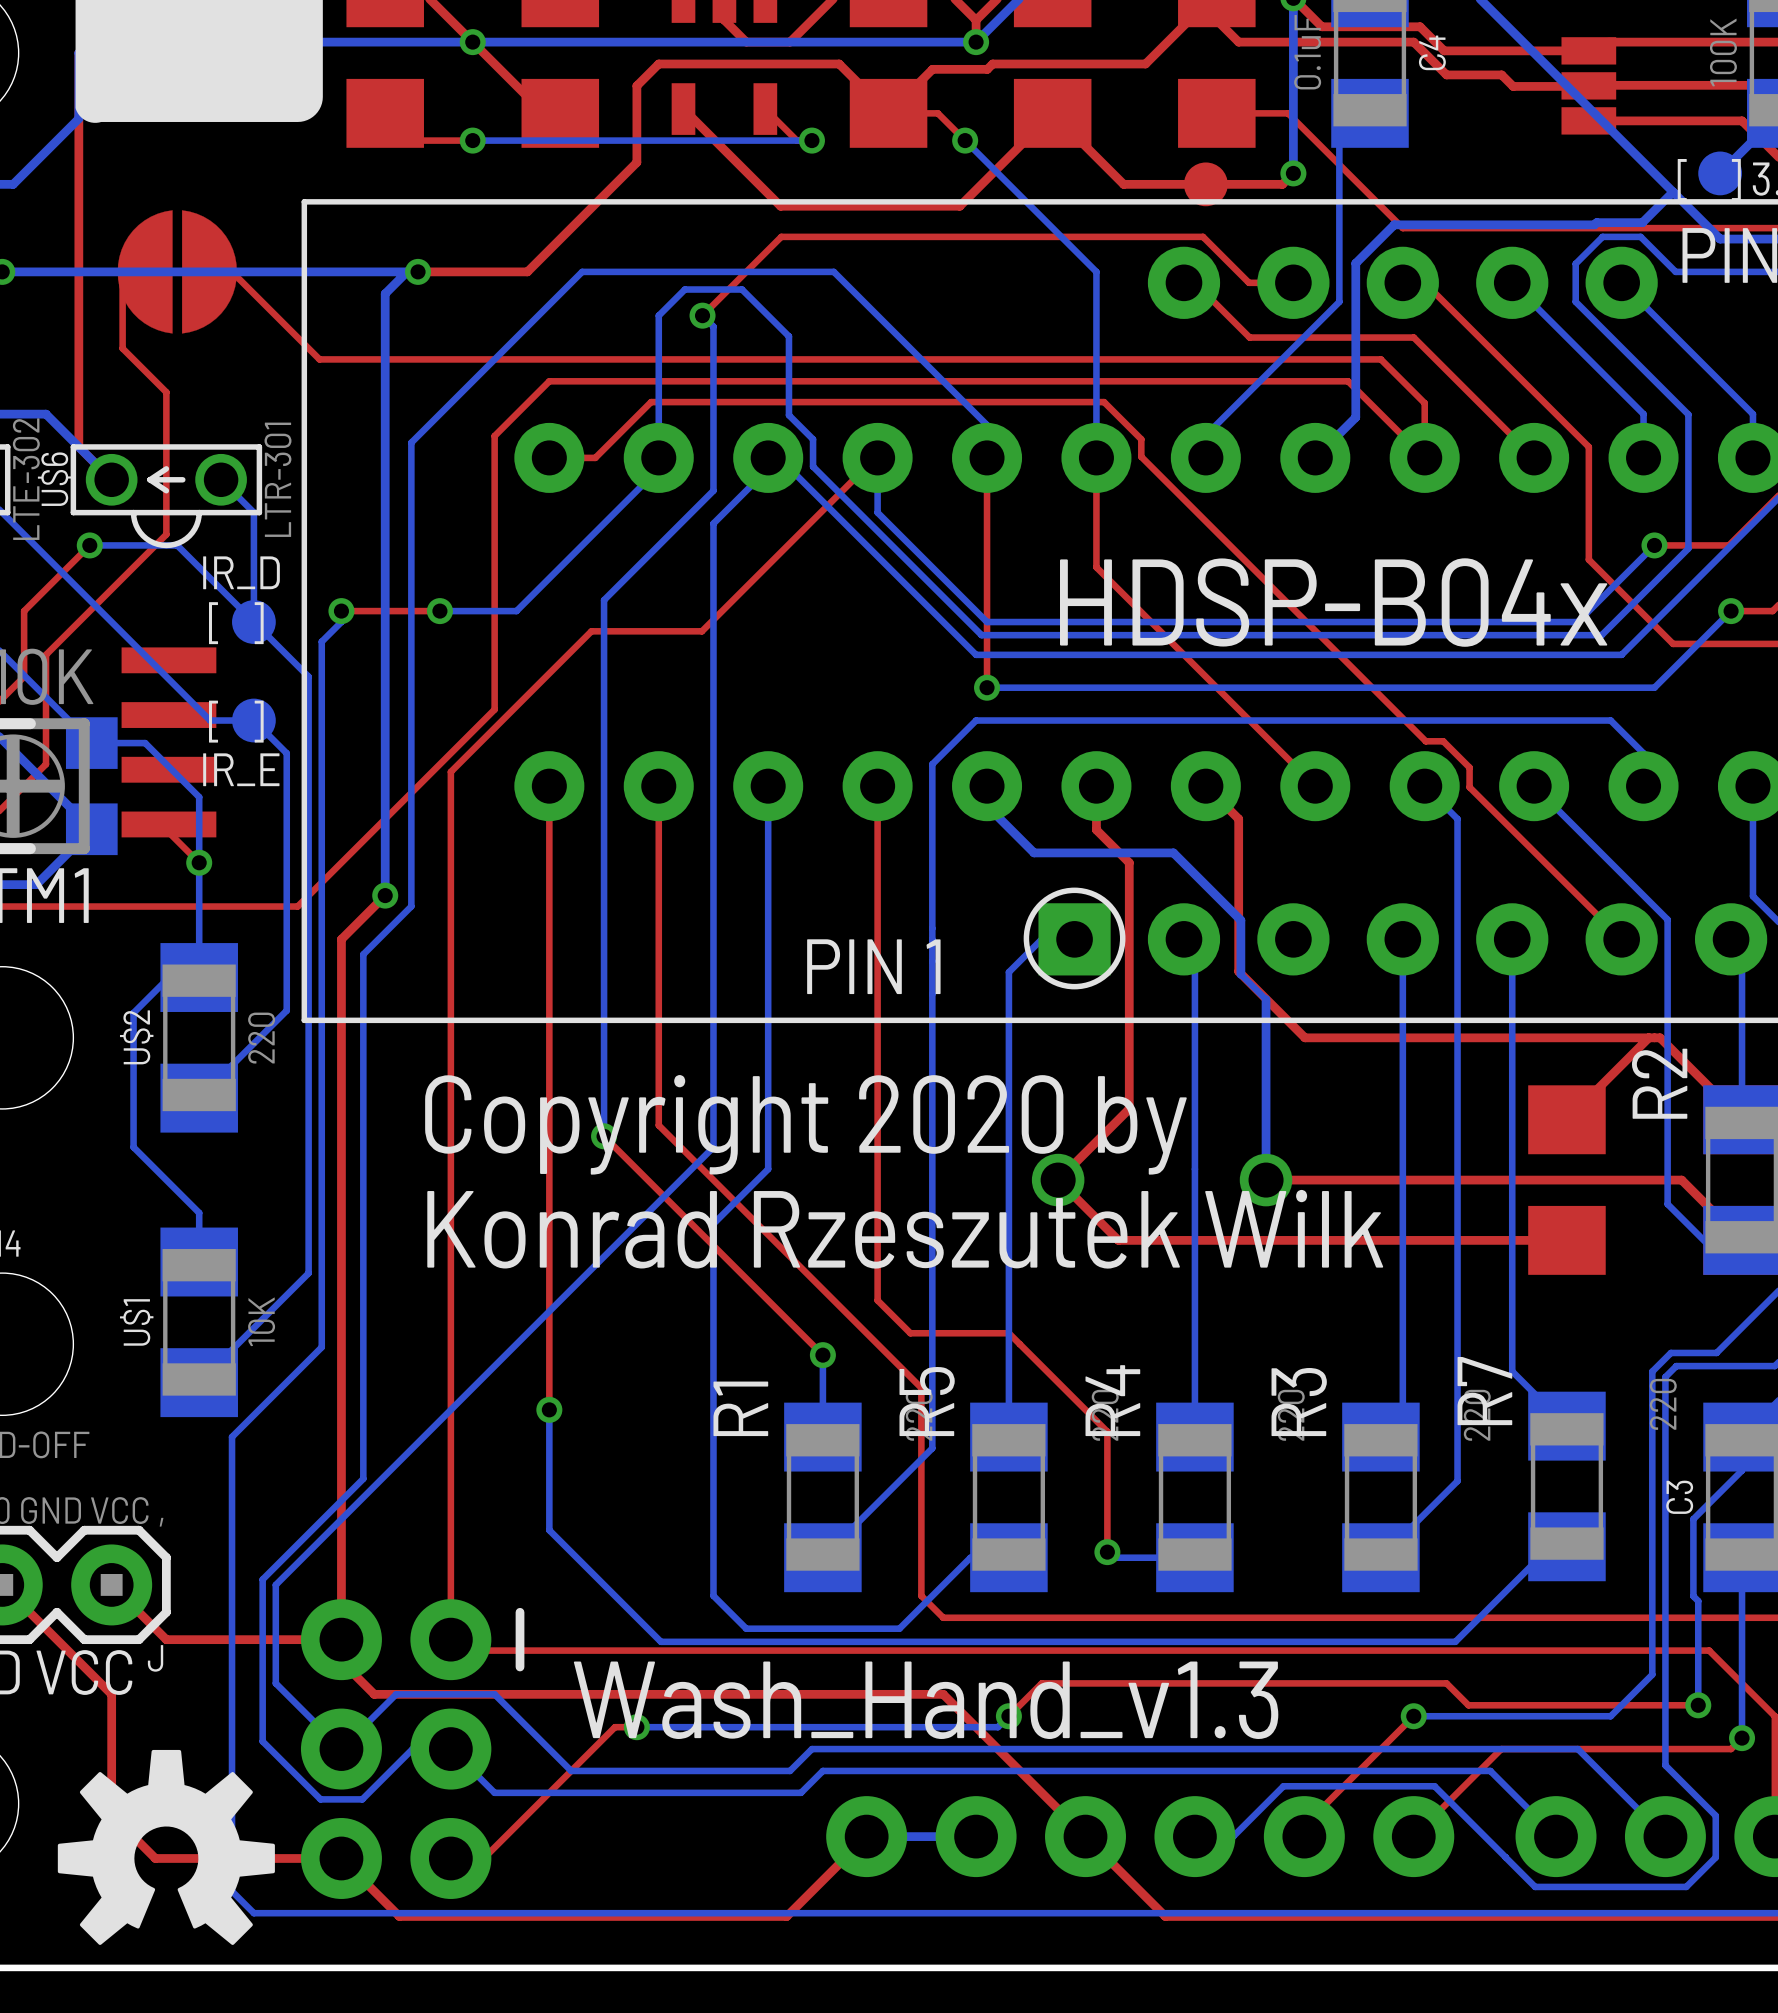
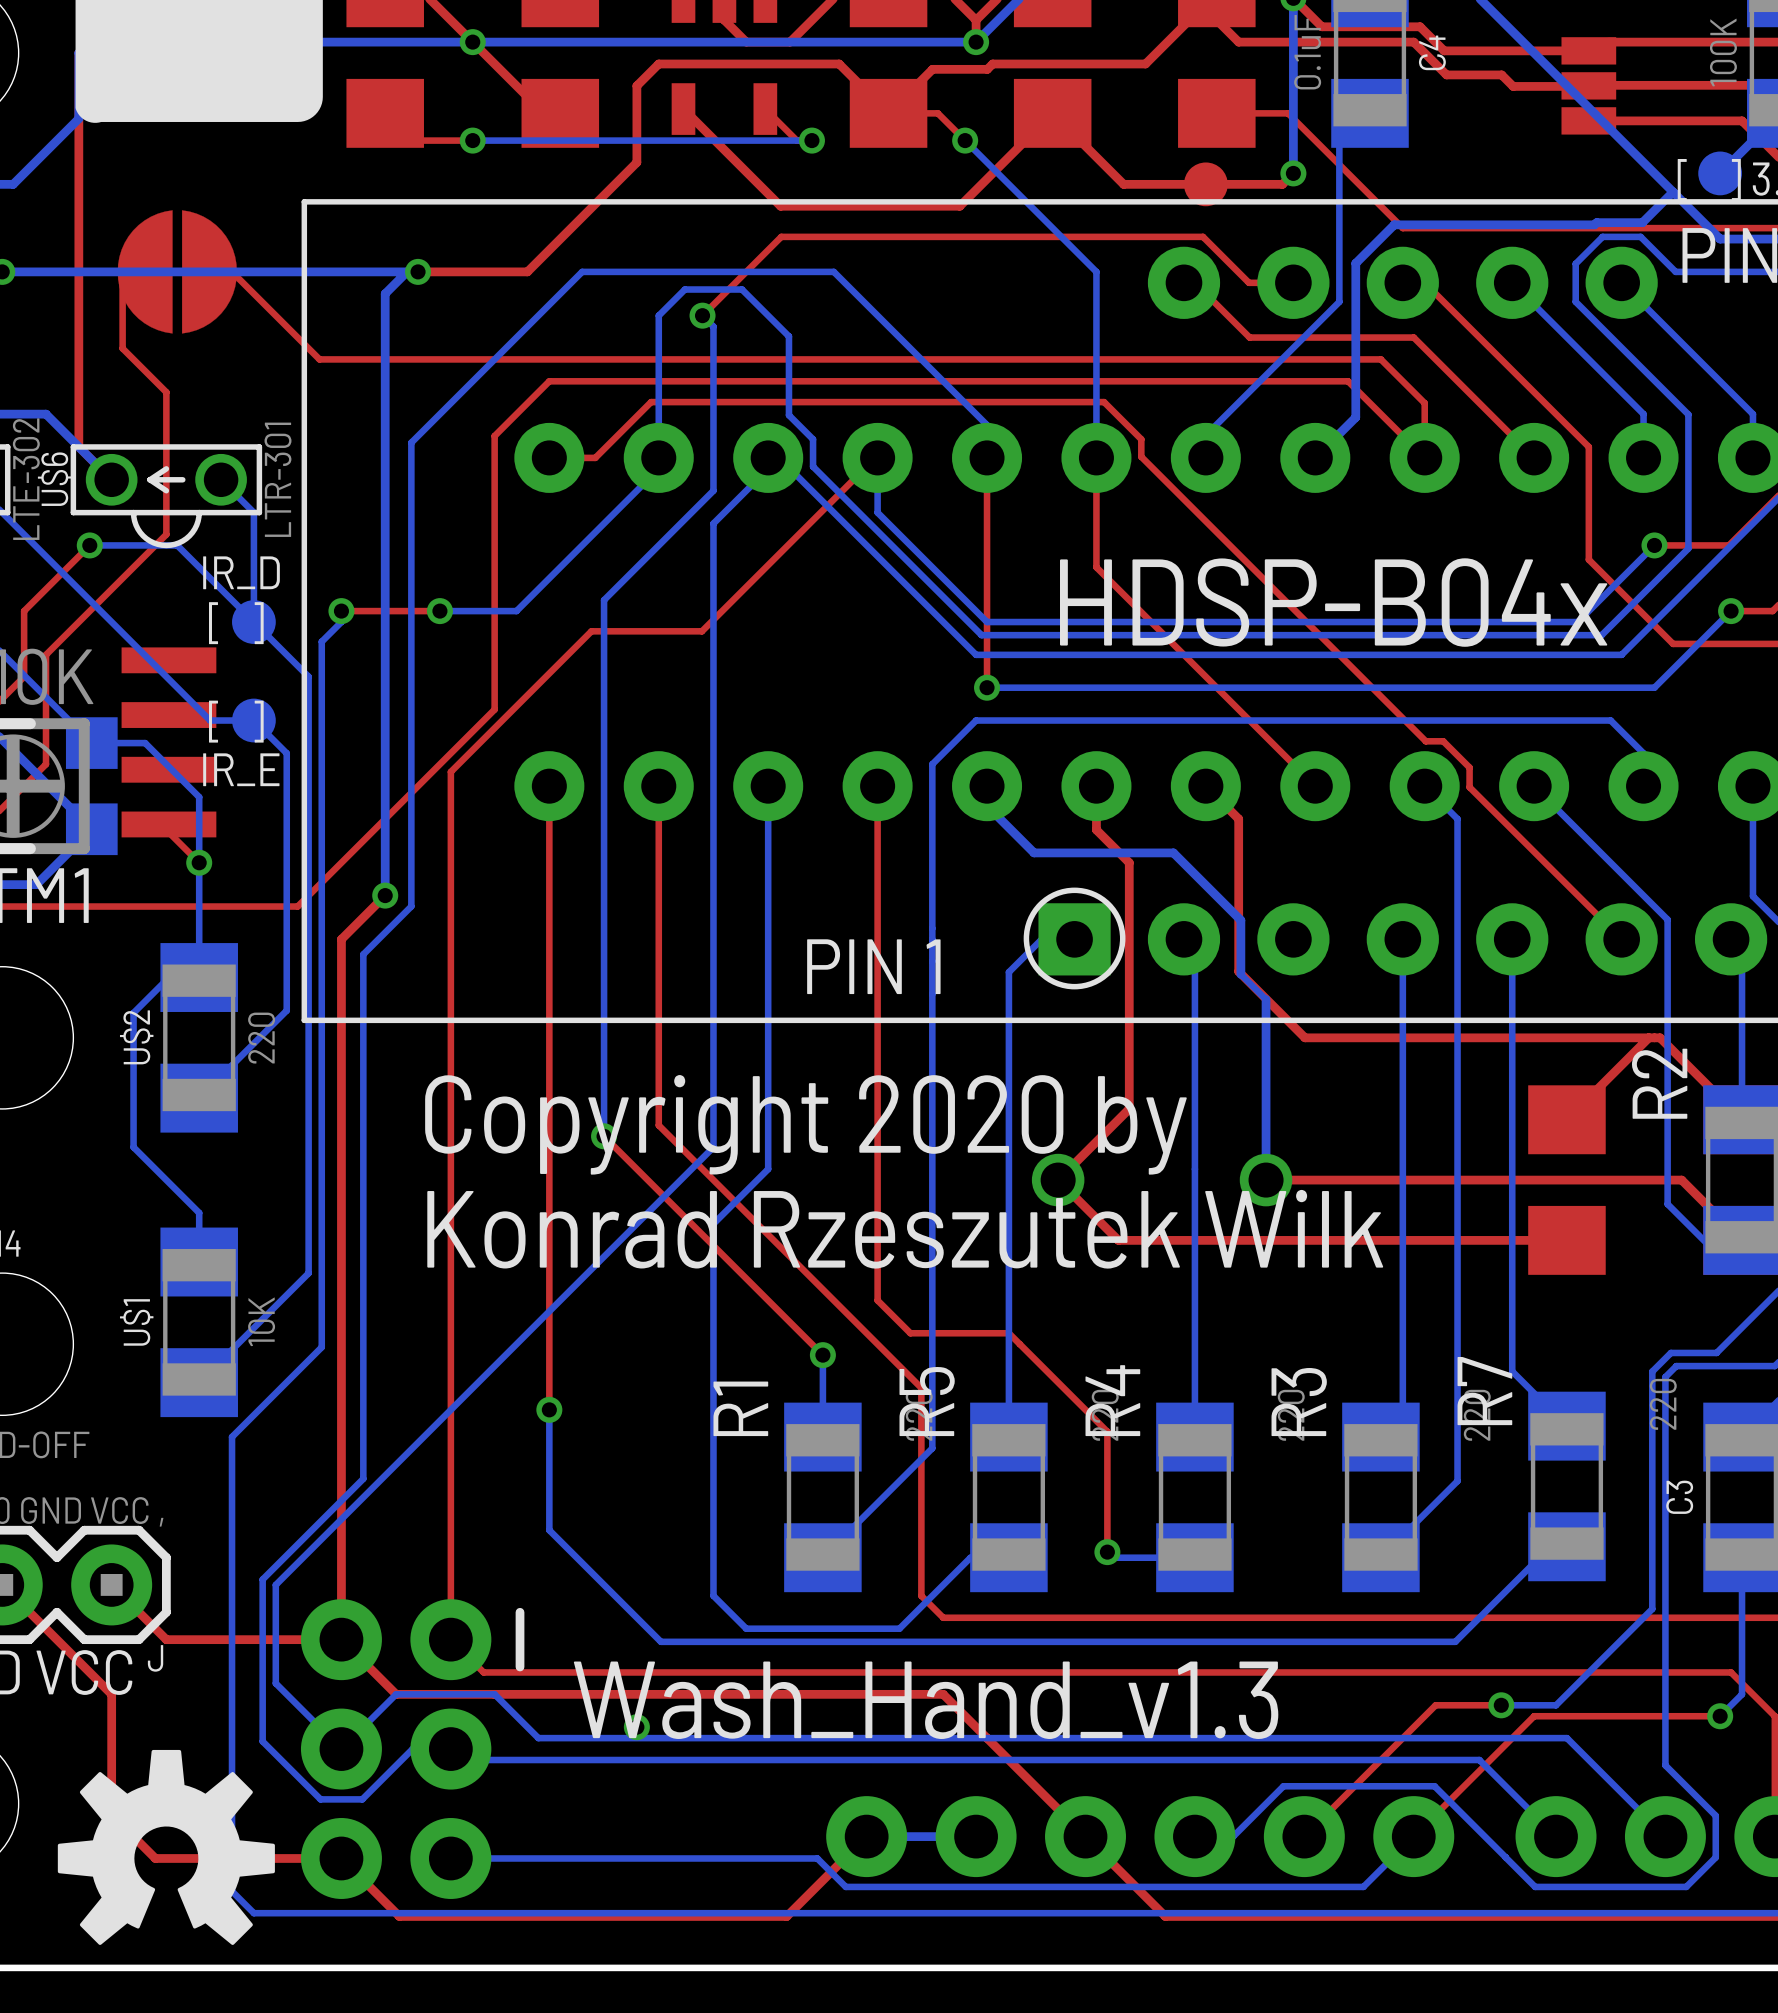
bottom track: (1742, 1437) (1742, 1470) (1693, 1519) (1693, 1596) (1698, 1601) (1698, 1705) -> none
bottom track: (1652, 1609) (1652, 1674) (1610, 1716) (1413, 1716) -> (1652, 1609) (1556, 1705) (1501, 1705)
top track: (341, 1639) (341, 1661) (374, 1694) (396, 1694) -> (341, 1639) (396, 1694)
top track: (461, 1650) (1709, 1650) (1731, 1672) -> (461, 1650) (483, 1672) (1731, 1672)
bottom track: (1742, 1694) (1742, 1738) -> (1742, 1694) (1720, 1716)
top track: (1468, 1705) (1446, 1683) (1041, 1683) (1008, 1716) -> none
top track: (1698, 1705) (1501, 1705) -> none
via: (1698, 1705) -> none
bottom track: (1008, 1716) (997, 1727) (636, 1727) -> none
via: (1008, 1716) -> none
top track: (1413, 1716) (1304, 1825) (1304, 1836) -> (1468, 1705) (1435, 1705) (1304, 1836)
via position: (1413, 1716) -> (1501, 1705)
via: none -> (1720, 1716)
top track: (636, 1727) (615, 1727) (483, 1858) (450, 1858) -> none
bottom track: (538, 1738) (571, 1770) (790, 1770) (811, 1749) (1577, 1749) -> (538, 1738) (1566, 1738) (1577, 1749)
top track: (1742, 1738) (1731, 1749) (1501, 1749) -> (1720, 1716) (1534, 1716) (1501, 1749)
via: (1742, 1738) -> none
bottom track: (461, 1760) (494, 1792) (801, 1792) (822, 1770) (1490, 1770) -> (461, 1760) (1479, 1760) (1490, 1770)
bottom track: none -> (1413, 1836) (1363, 1886) (845, 1886) (817, 1858) (450, 1858)

